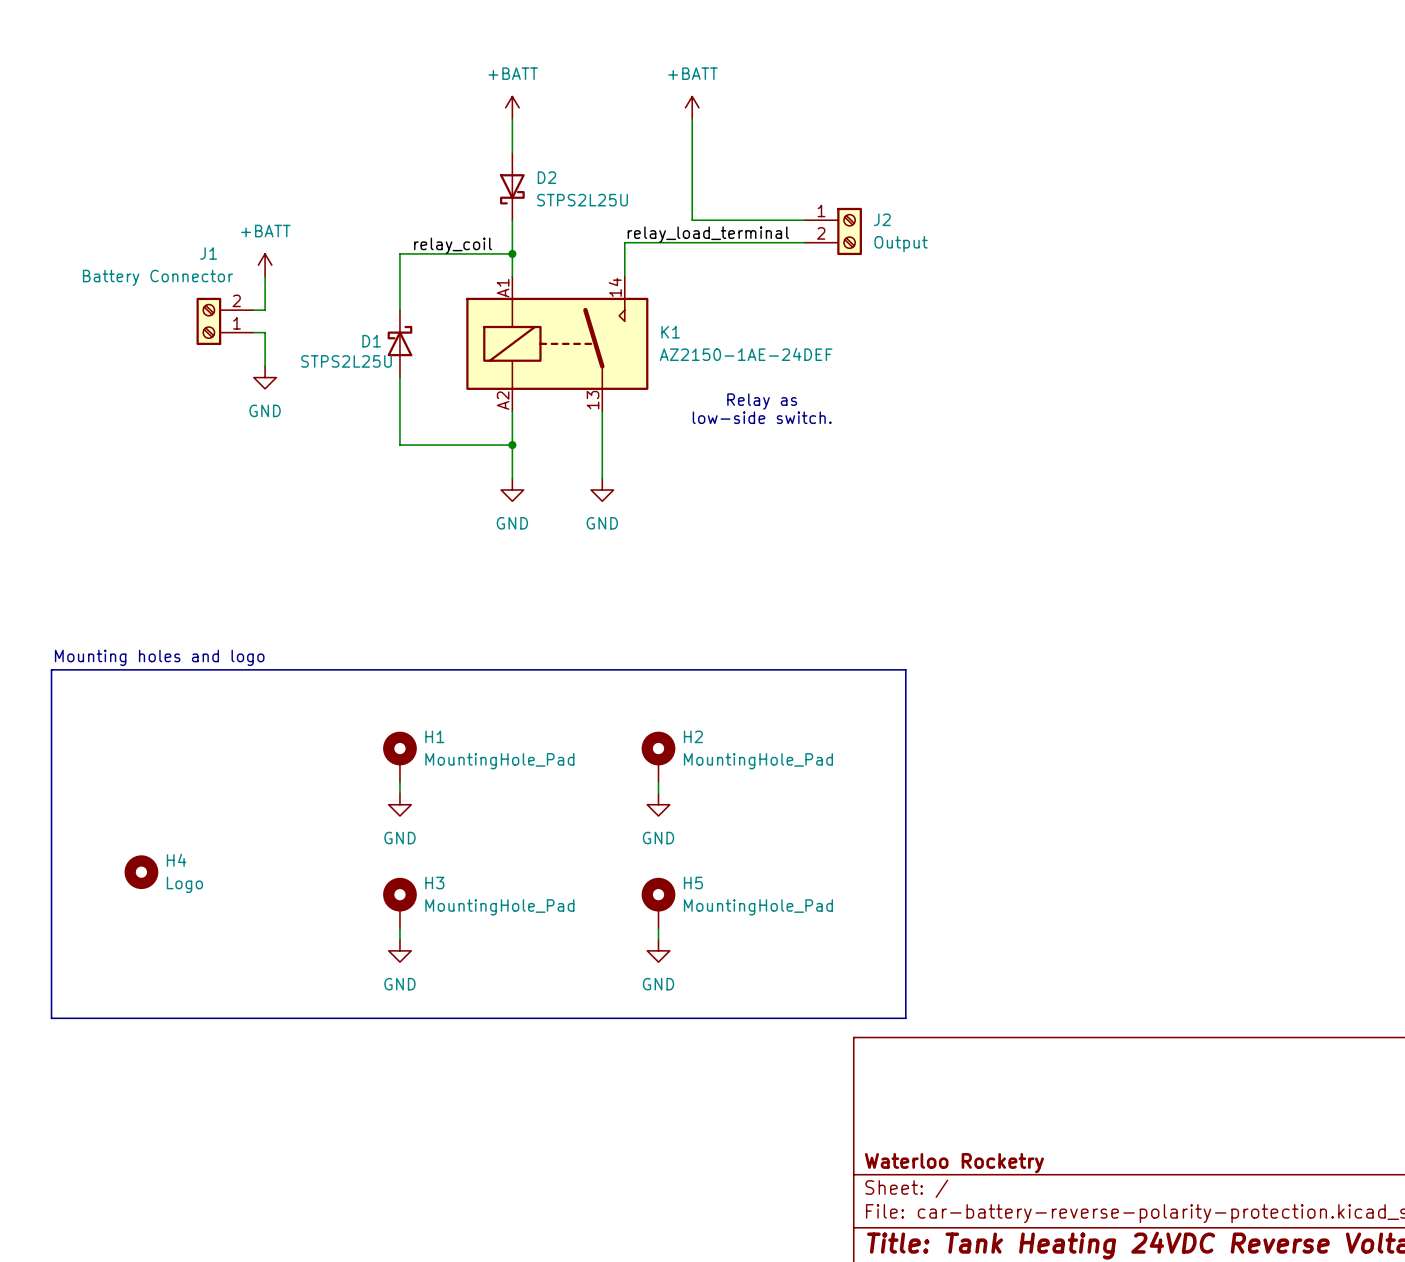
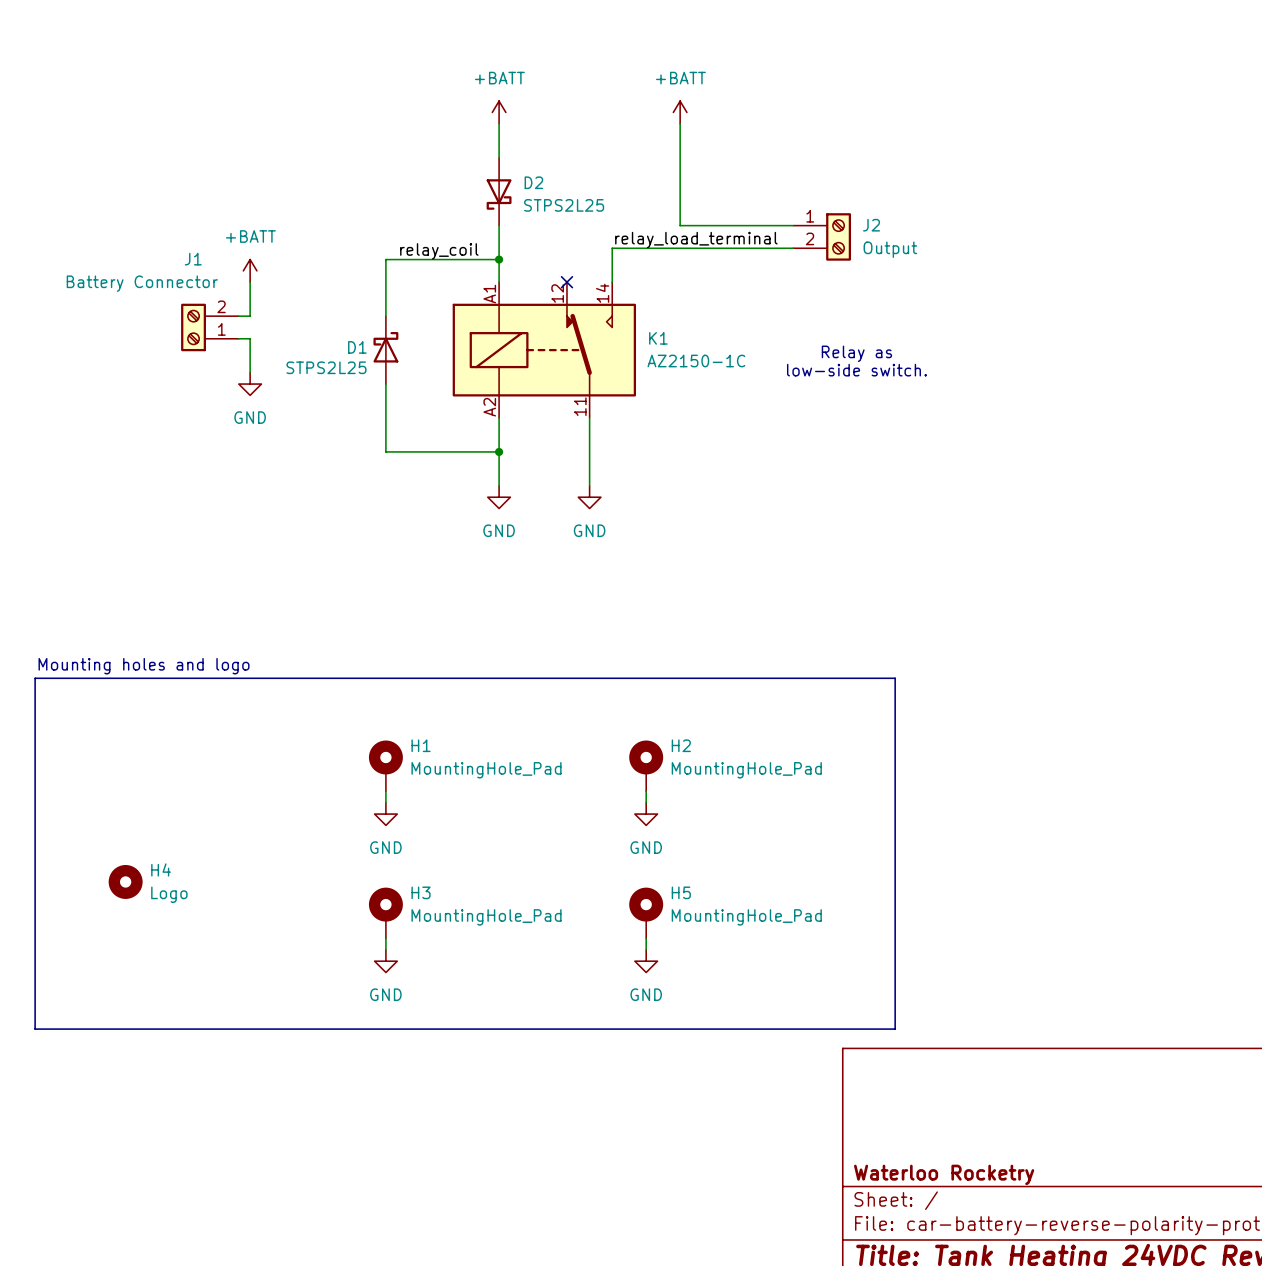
D2 value: STPS2L25U (582, 200) -> STPS2L25 (564, 205)
K1 symbol: [466, 276, 649, 412] -> [452, 282, 637, 419]
no-connect mark: none -> (566, 282)
K1 value: AZ2150-1AE-24DEF (746, 354) -> AZ2150-1C (696, 360)
D1 value: STPS2L25U (346, 361) -> STPS2L25 (326, 367)
text position: Relay as (762, 401) -> Relay as (856, 353)
text position: low-side switch. (762, 417) -> low-side switch. (856, 370)

